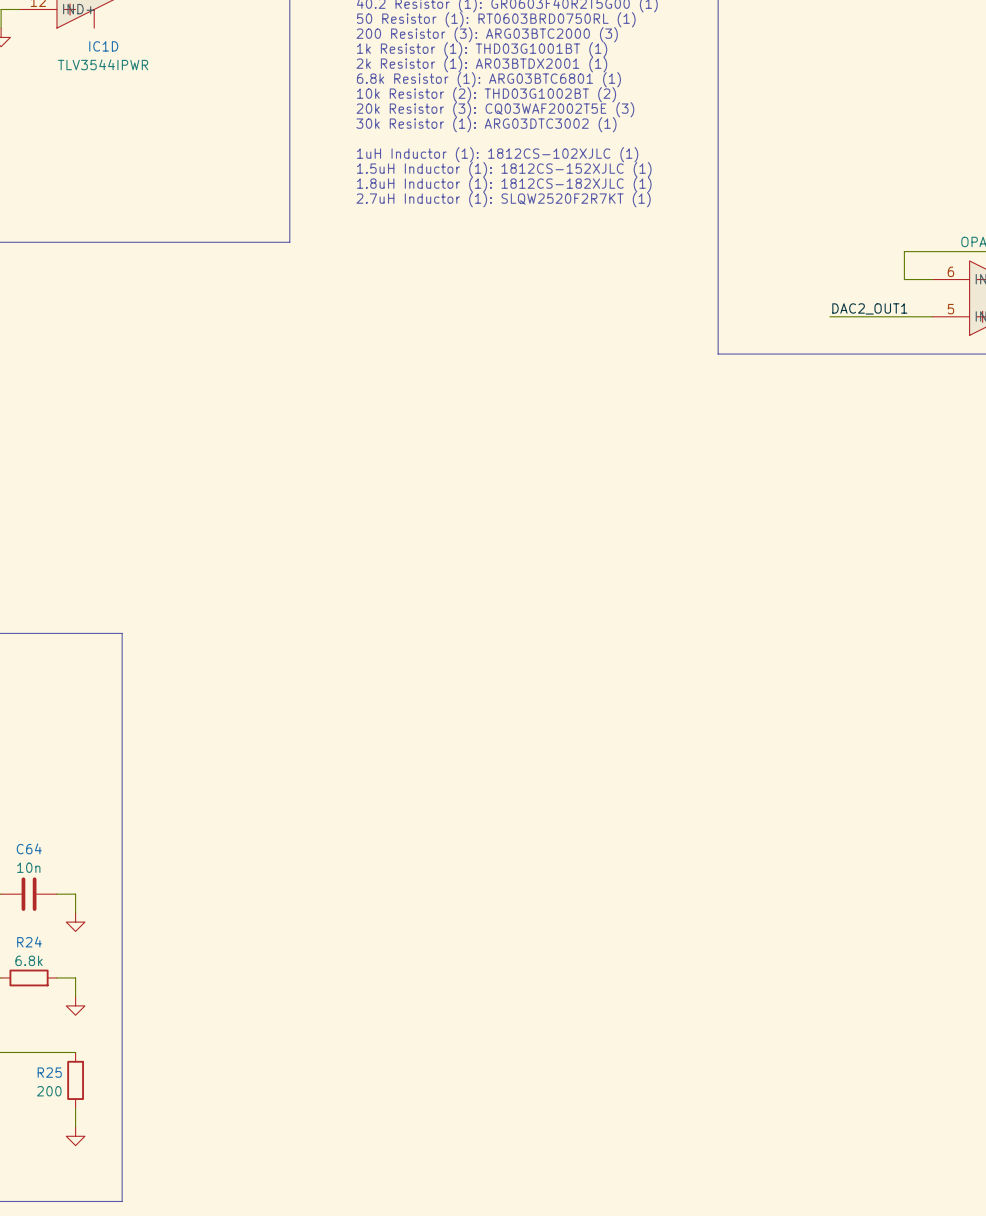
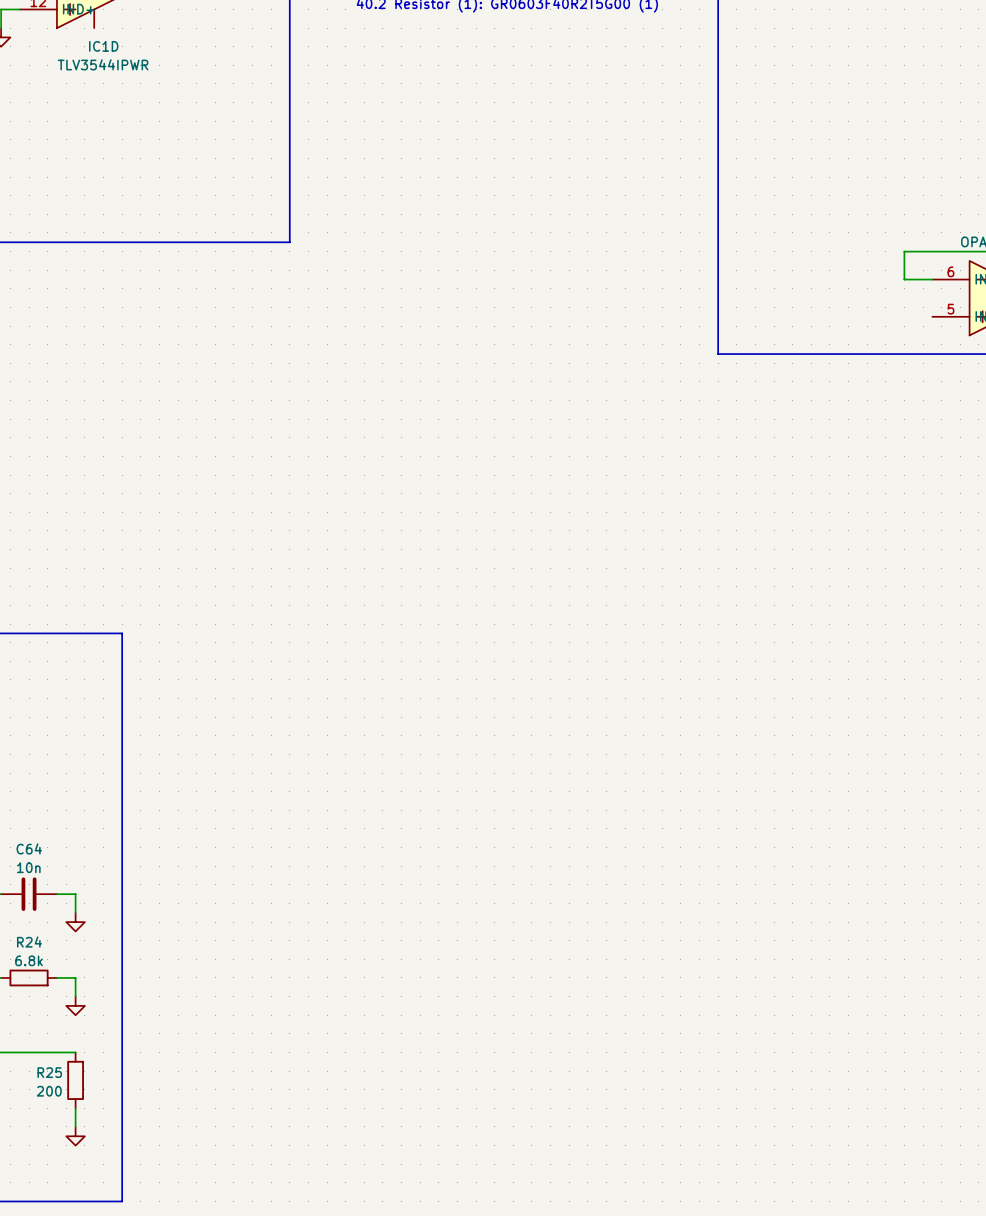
text: 50 Resistor (1): RT0603BRD0750RL (1) (496, 19) -> none
text: 200 Resistor (3): ARG03BTC2000 (3) (487, 34) -> none
text: 1k Resistor (1): THD03G1001BT (1) (482, 49) -> none
text: 2k Resistor (1): AR03BTDX2001 (1) (481, 64) -> none
text: 6.8k Resistor (1): ARG03BTC6801 (1) (488, 79) -> none
text: 10k Resistor (2): THD03G1002BT (2) (486, 94) -> none
text: 20k Resistor (3): CQ03WAF2002T5E (3) (495, 109) -> none
text: 30k Resistor (1): ARG03DTC3002 (1) (486, 124) -> none
text: 1uH Inductor (1): 1812CS-102XJLC (1) (497, 154) -> none
text: 1.5uH Inductor (1): 1812CS-152XJLC (1) (504, 169) -> none
text: 1.8uH Inductor (1): 1812CS-182XJLC (1) (504, 184) -> none
text: 2.7uH Inductor (1): SLQW2520F2R7KT (1) (503, 199) -> none
label: DAC2_OUT1 (869, 308) -> none
wire: (829, 316) (932, 316) -> none

